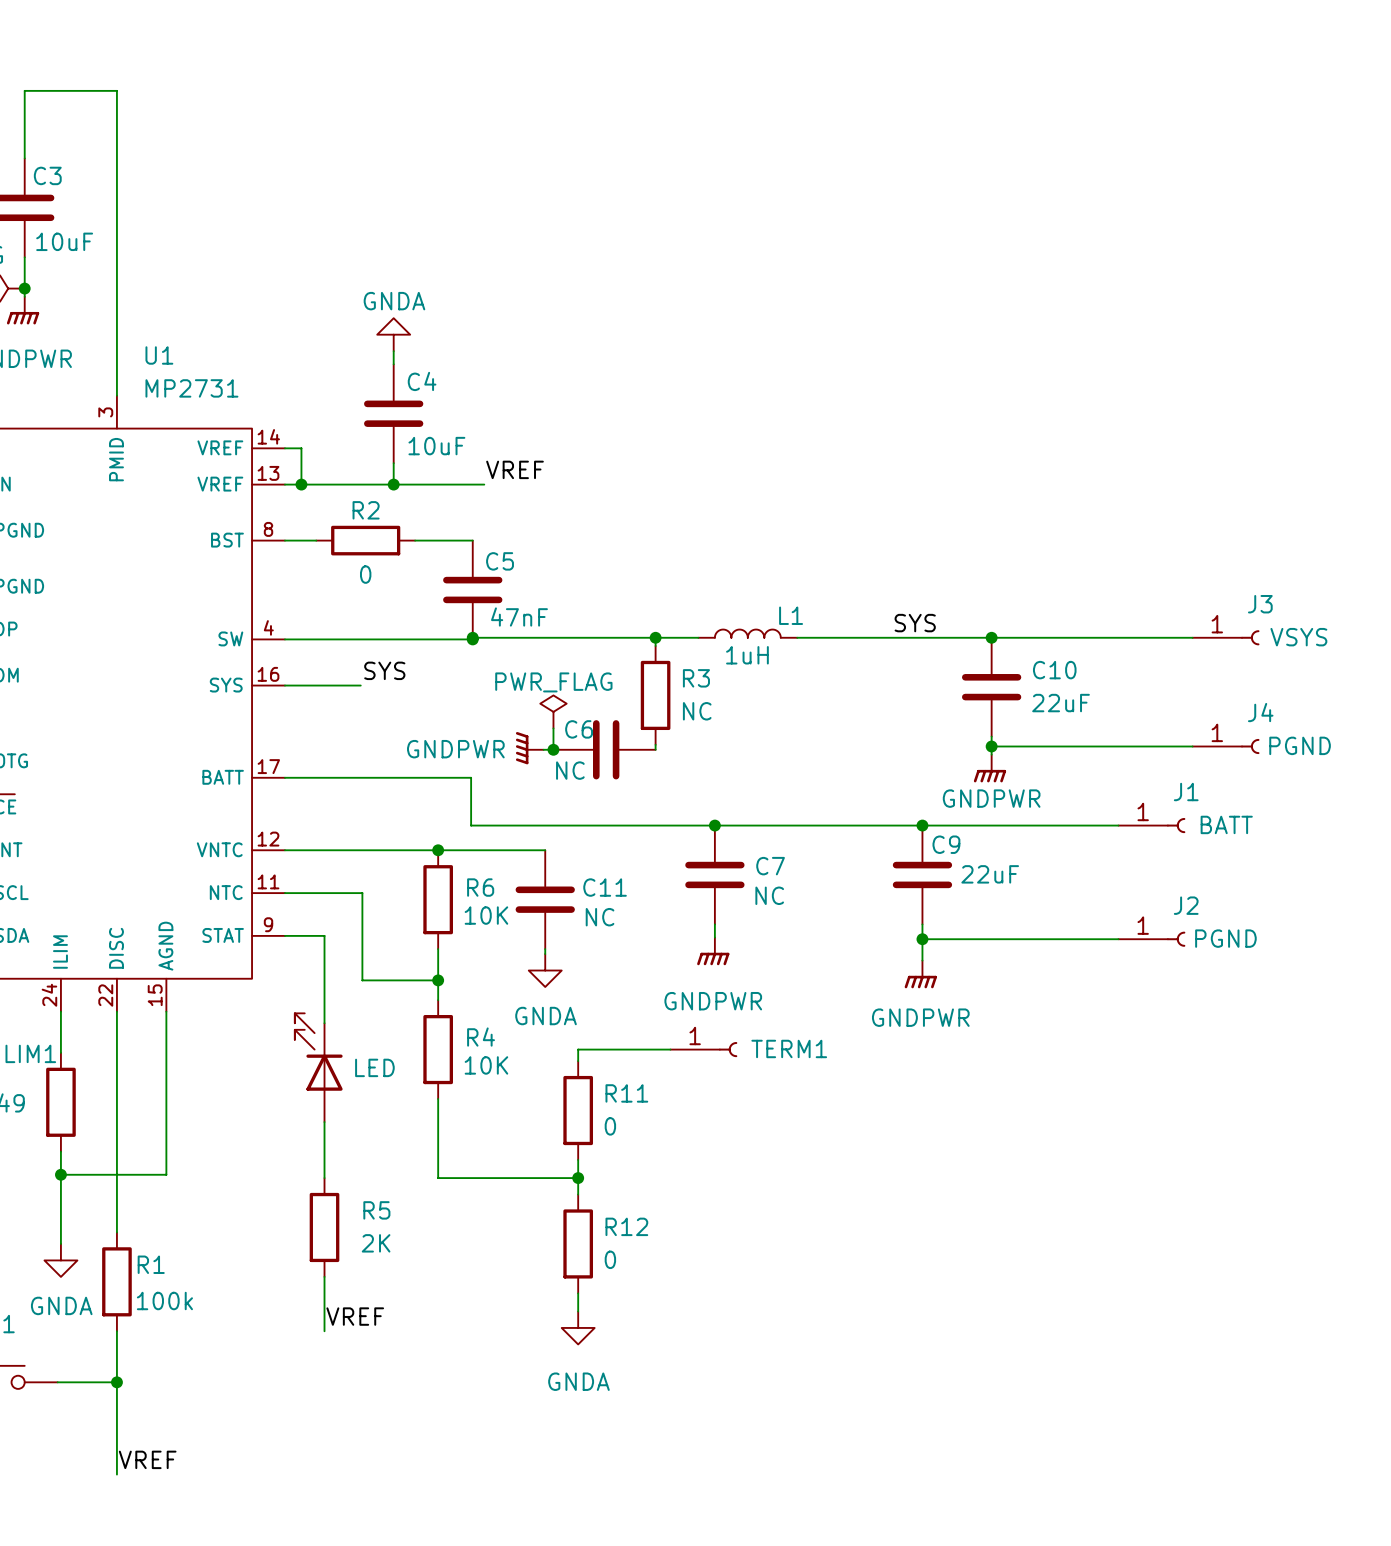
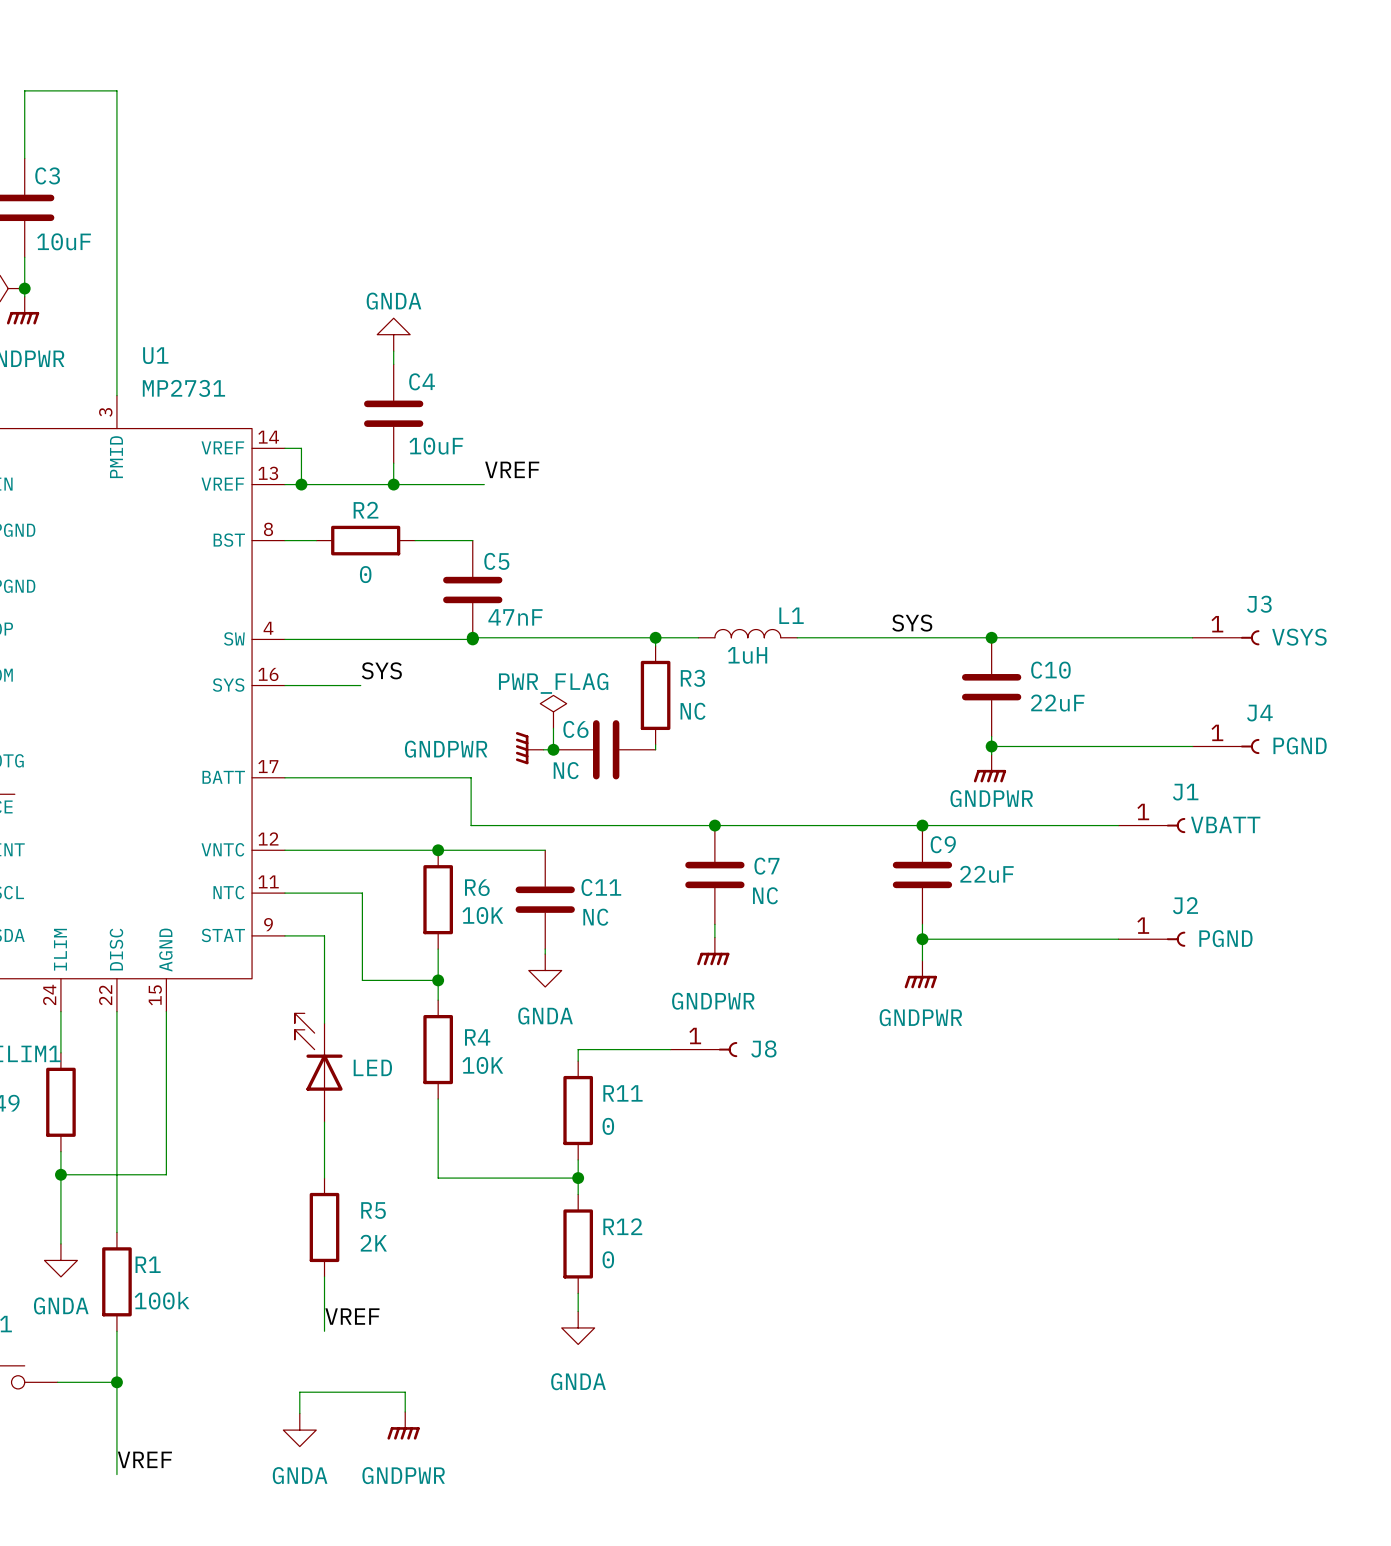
J1 text: BATT (1226, 824) -> VBATT (1225, 824)
TERM1 name: TERM1 (789, 1048) -> J8 (763, 1048)
wire: none -> (405, 1411) (405, 1392) (299, 1392) (299, 1413)
power symbol: none -> GNDPWR (403, 1425)
power symbol: none -> GNDA (299, 1430)

